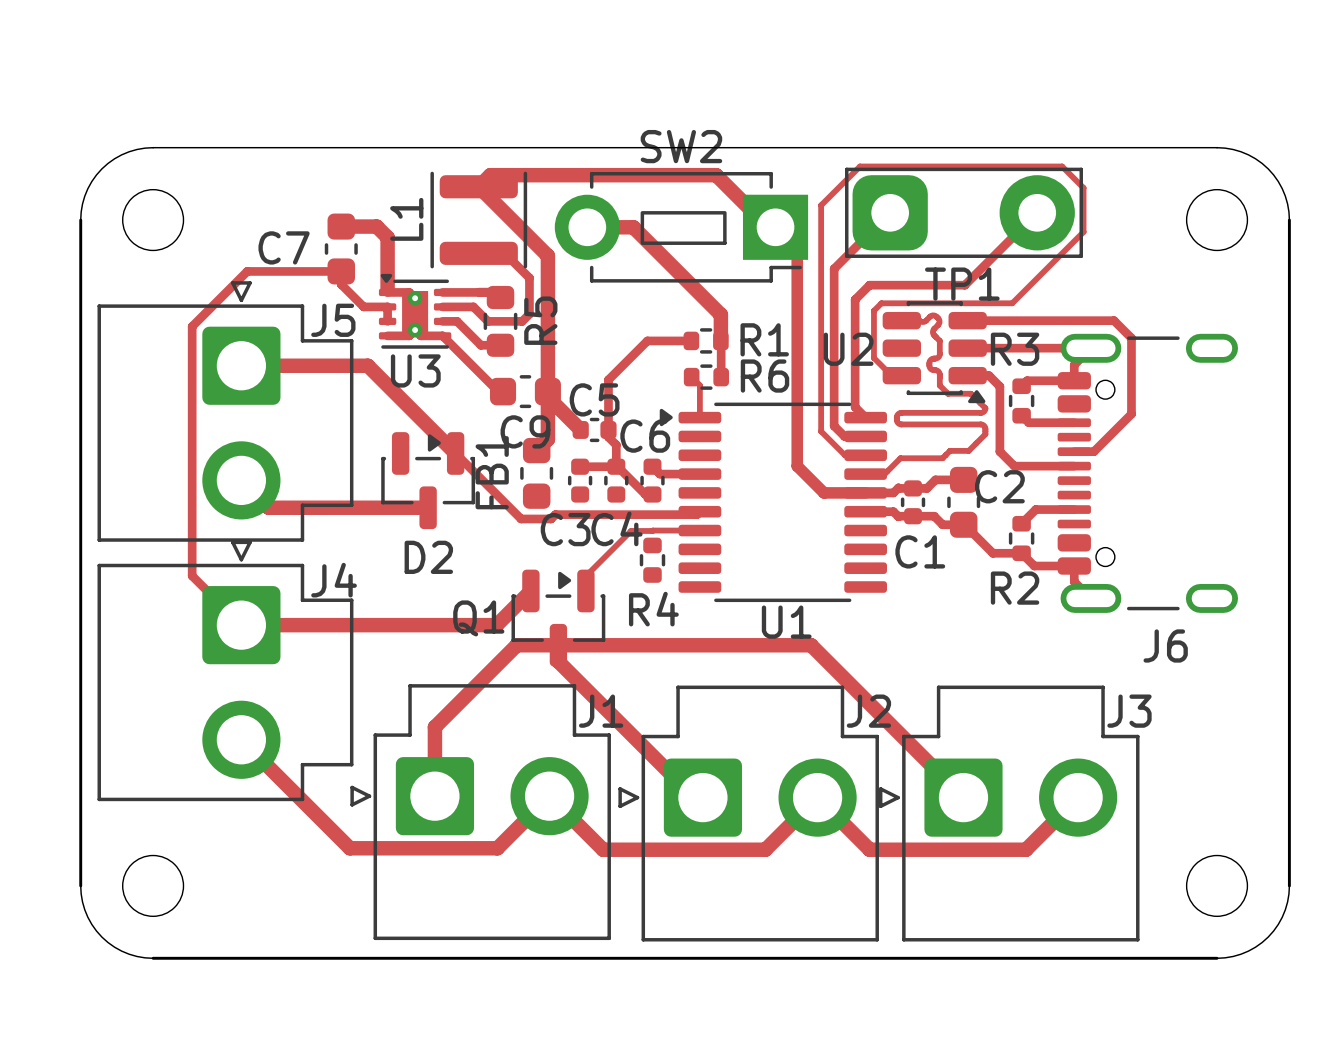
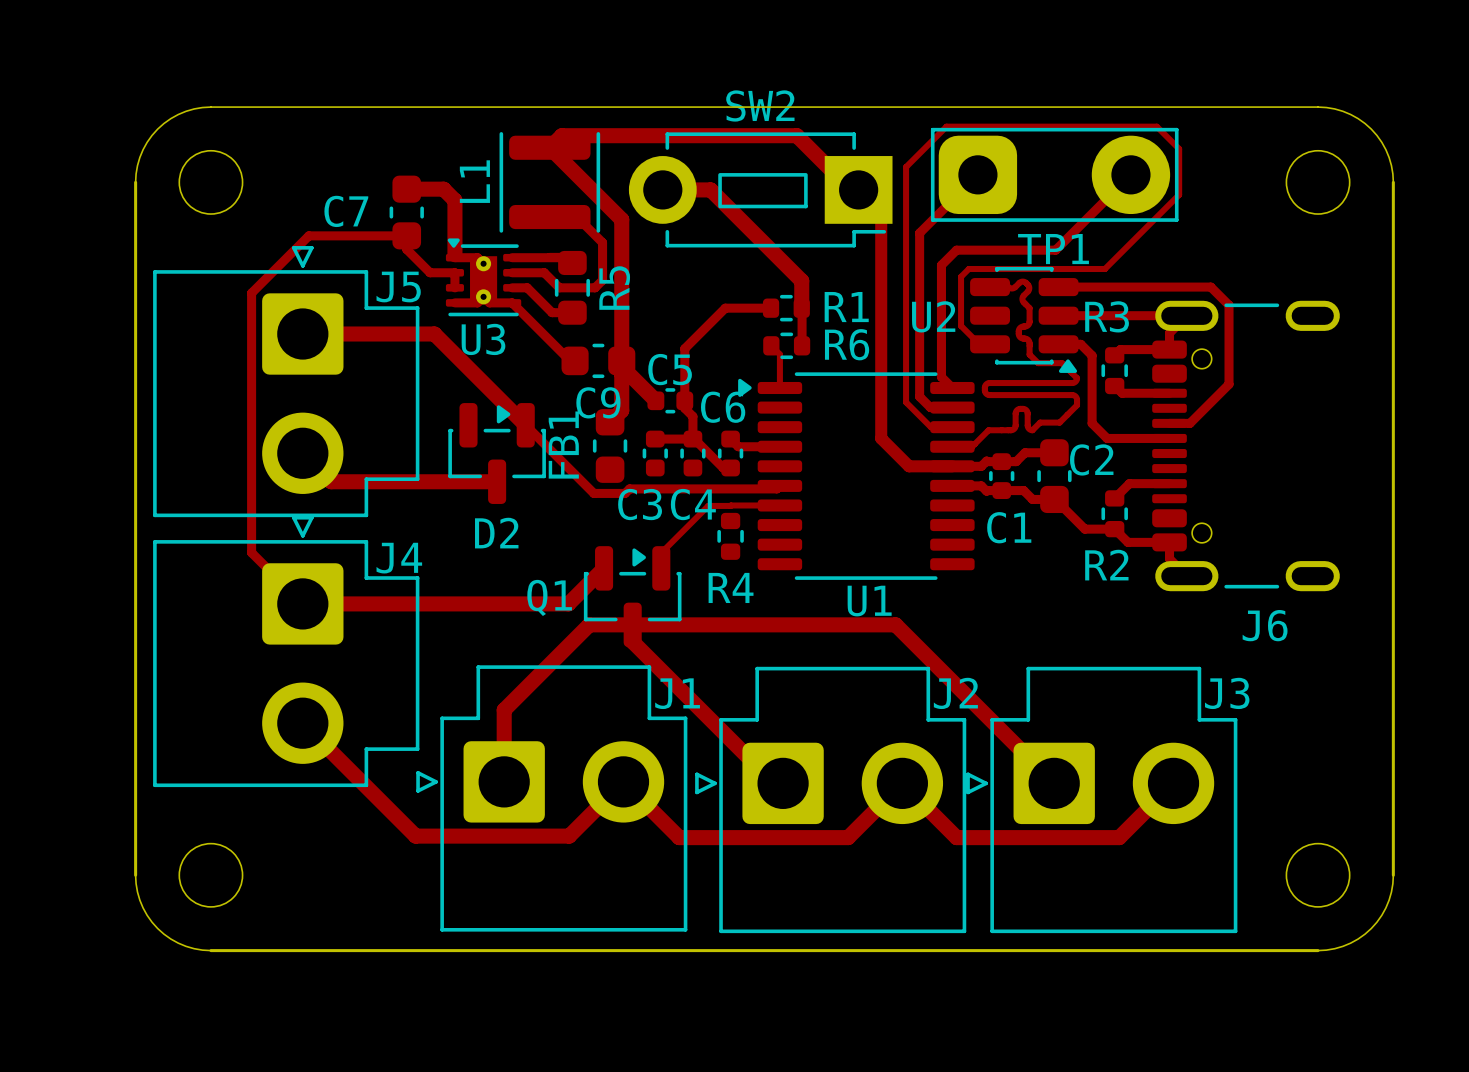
track: (921, 458) (942, 458) -> (1010, 430) (1015, 427) (1015, 412) (1020, 408) (1027, 411) (1027, 426) (1032, 430)

